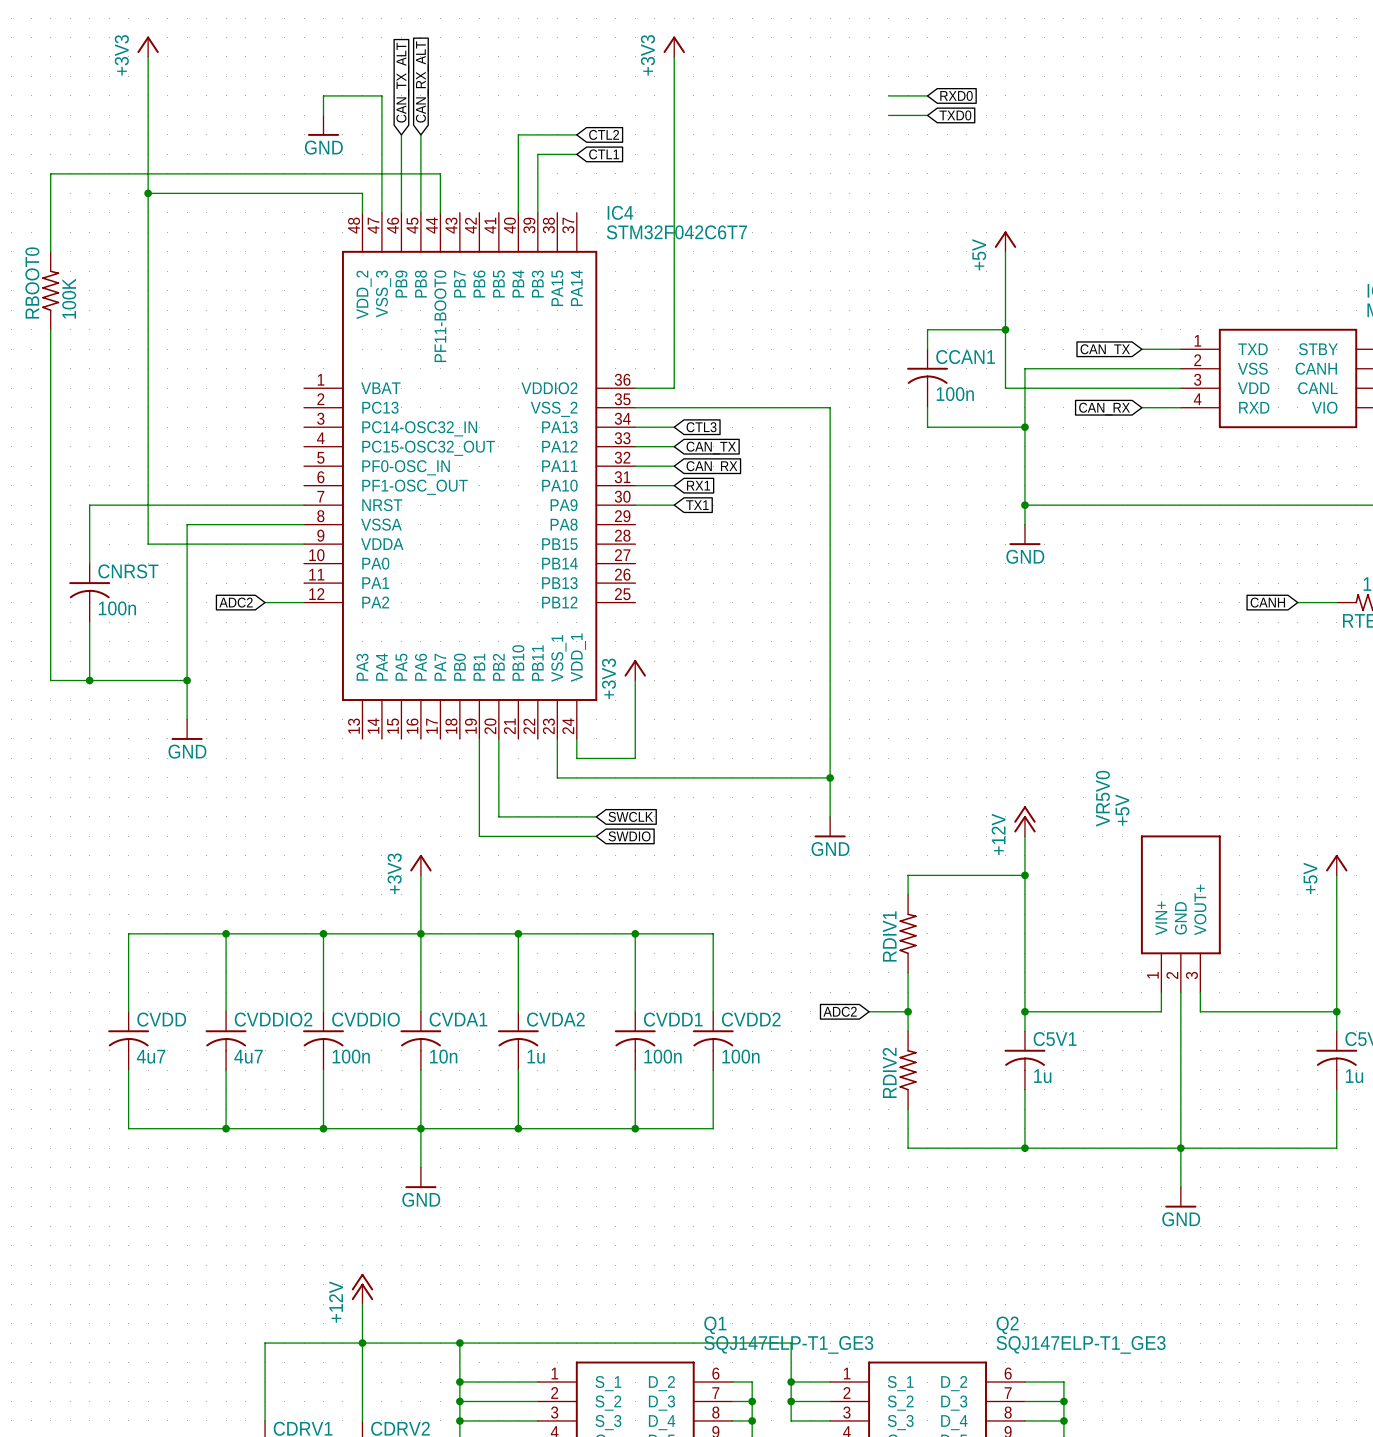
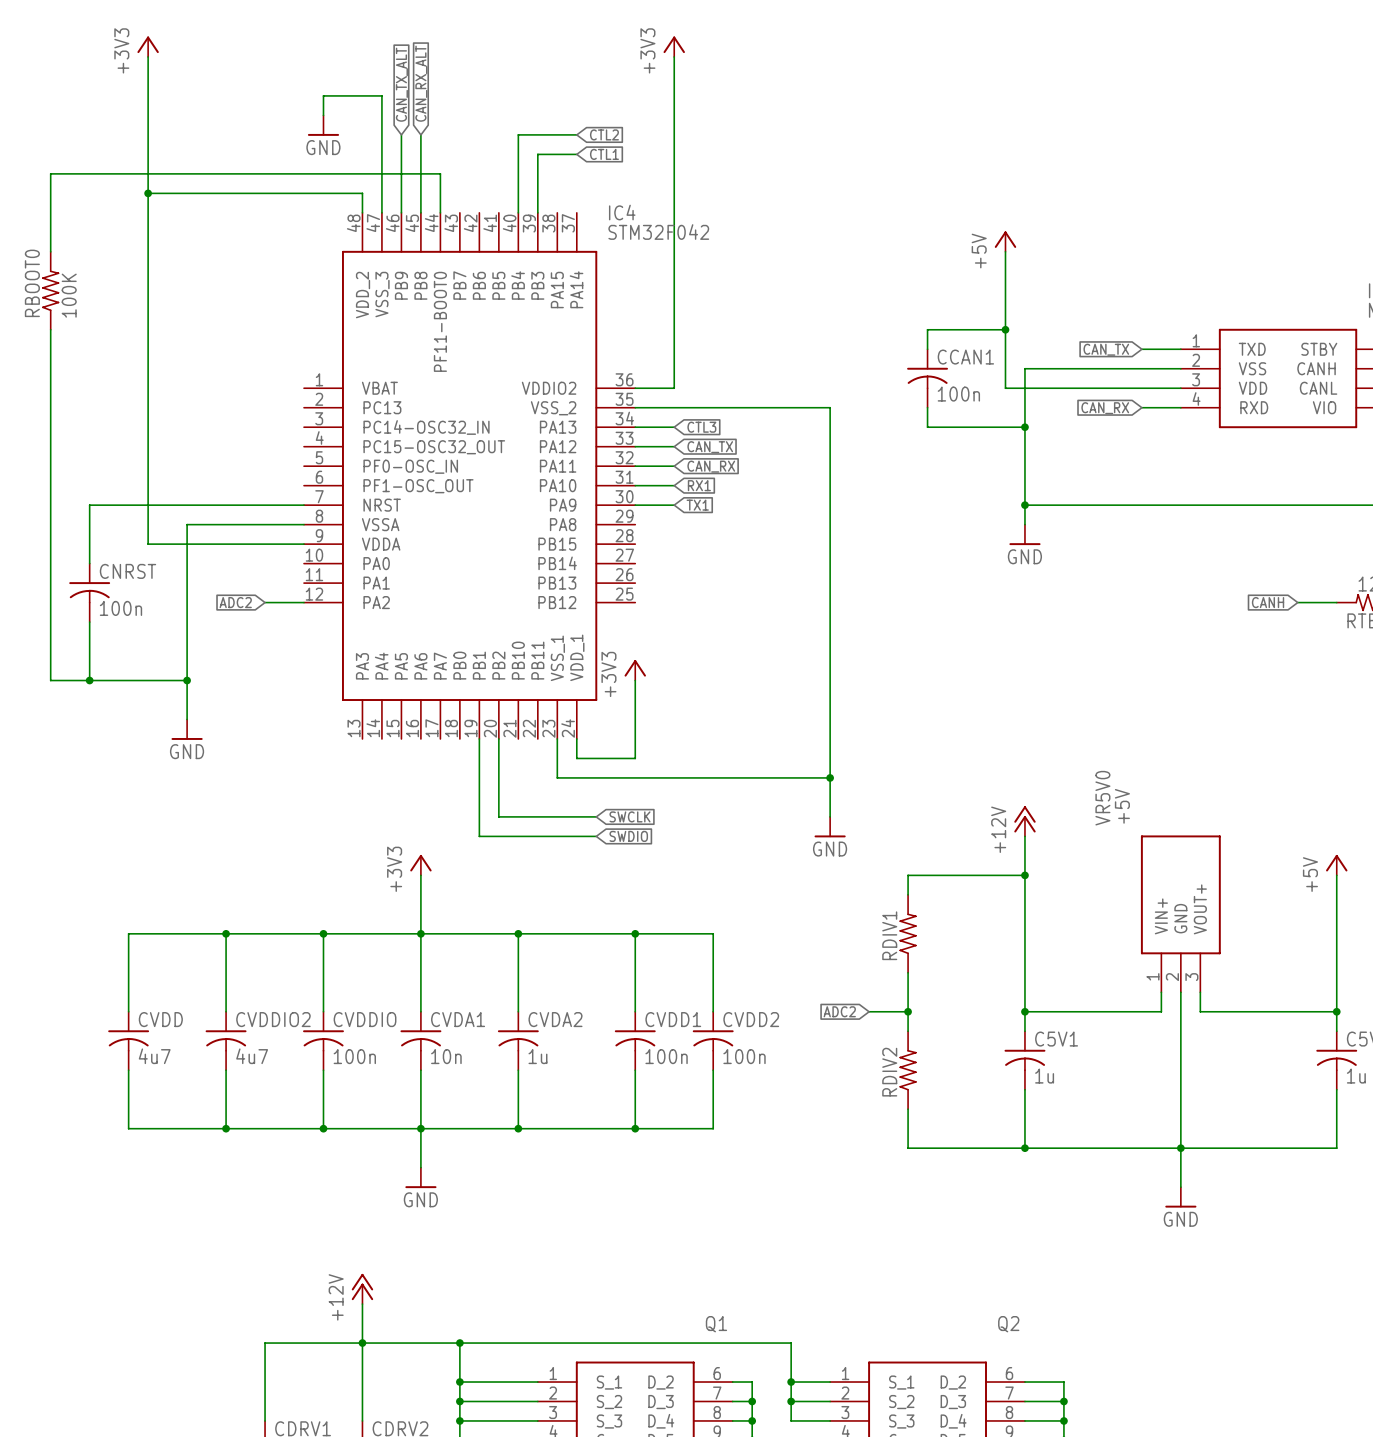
wire: (888, 95) (927, 95) -> none
global label: RXD0 (956, 95) -> none
wire: (888, 115) (927, 115) -> none
global label: TXD0 (955, 115) -> none
IC4 value: STM32F042C6T7 (676, 232) -> STM32F042 (658, 232)
Q1 value: SQJ147ELP-T1_GE3 (788, 1344) -> none
Q2 value: SQJ147ELP-T1_GE3 (1081, 1344) -> none

